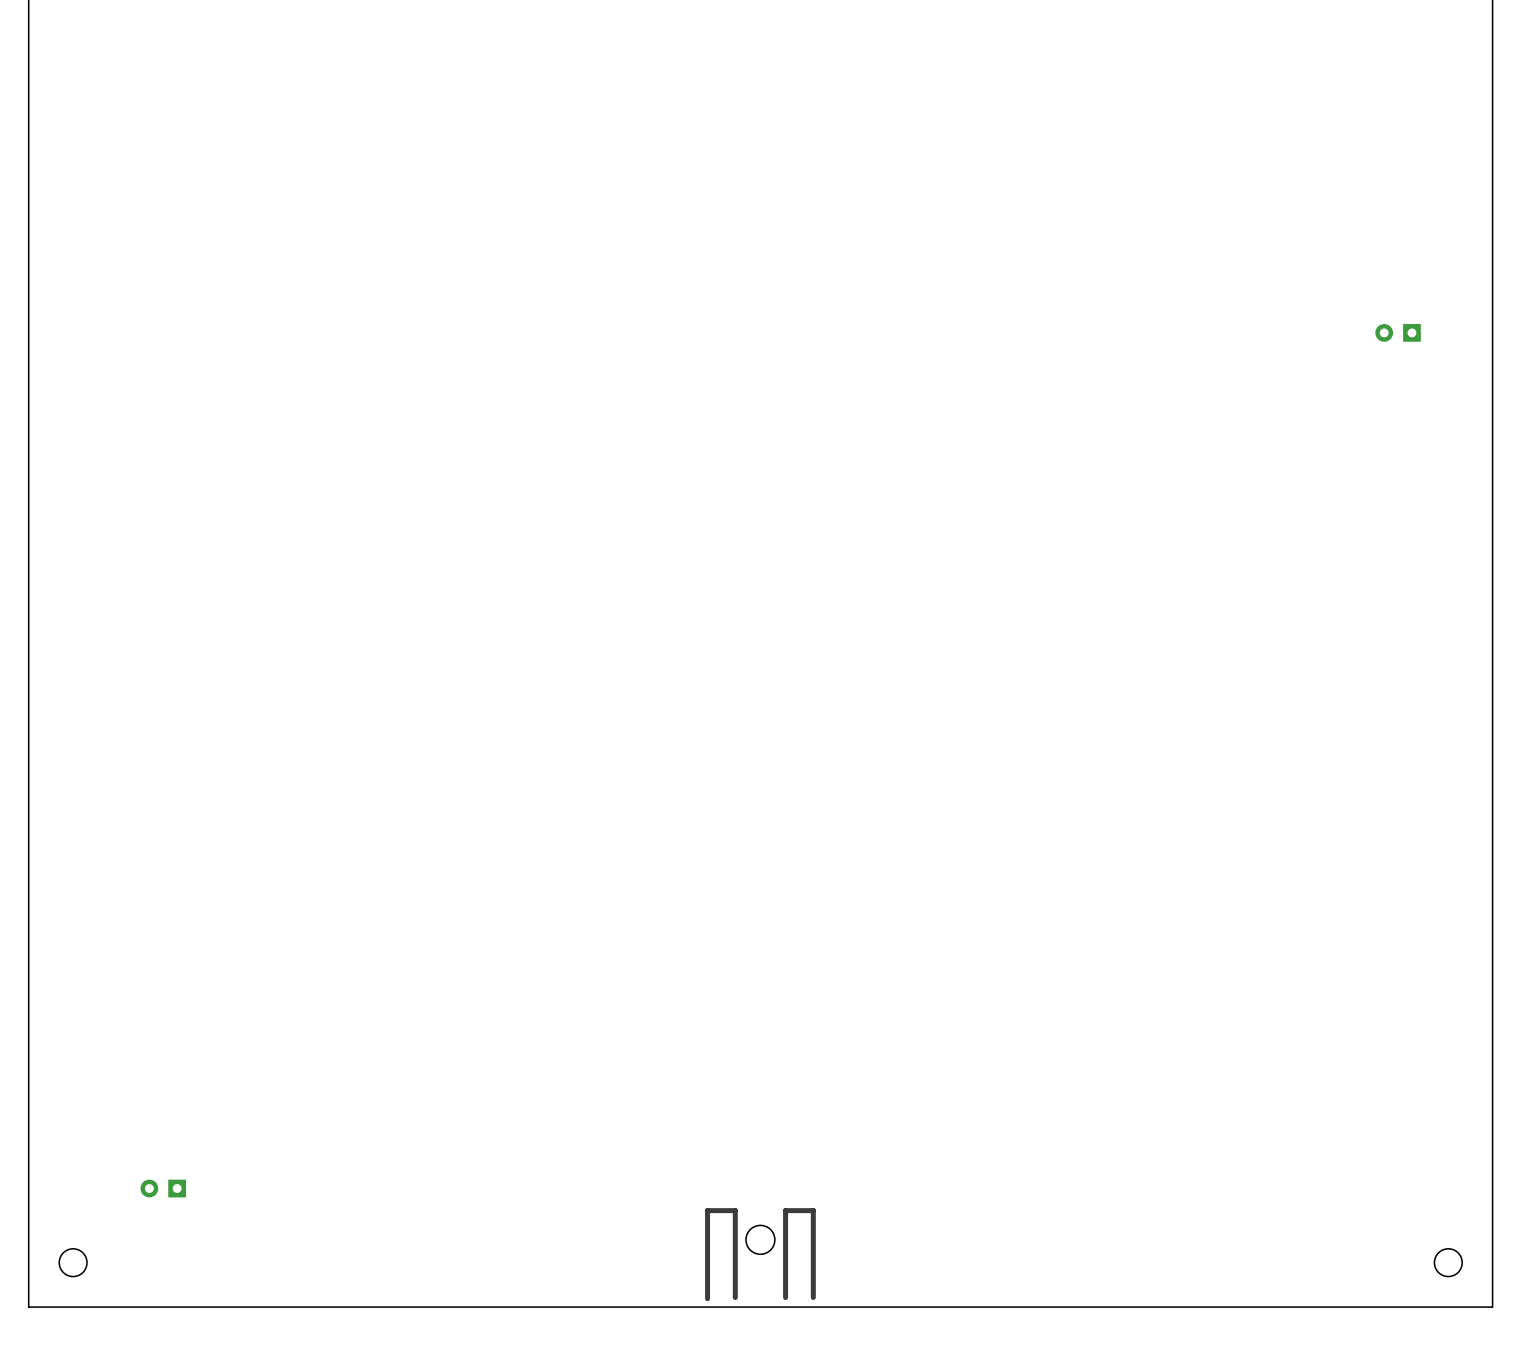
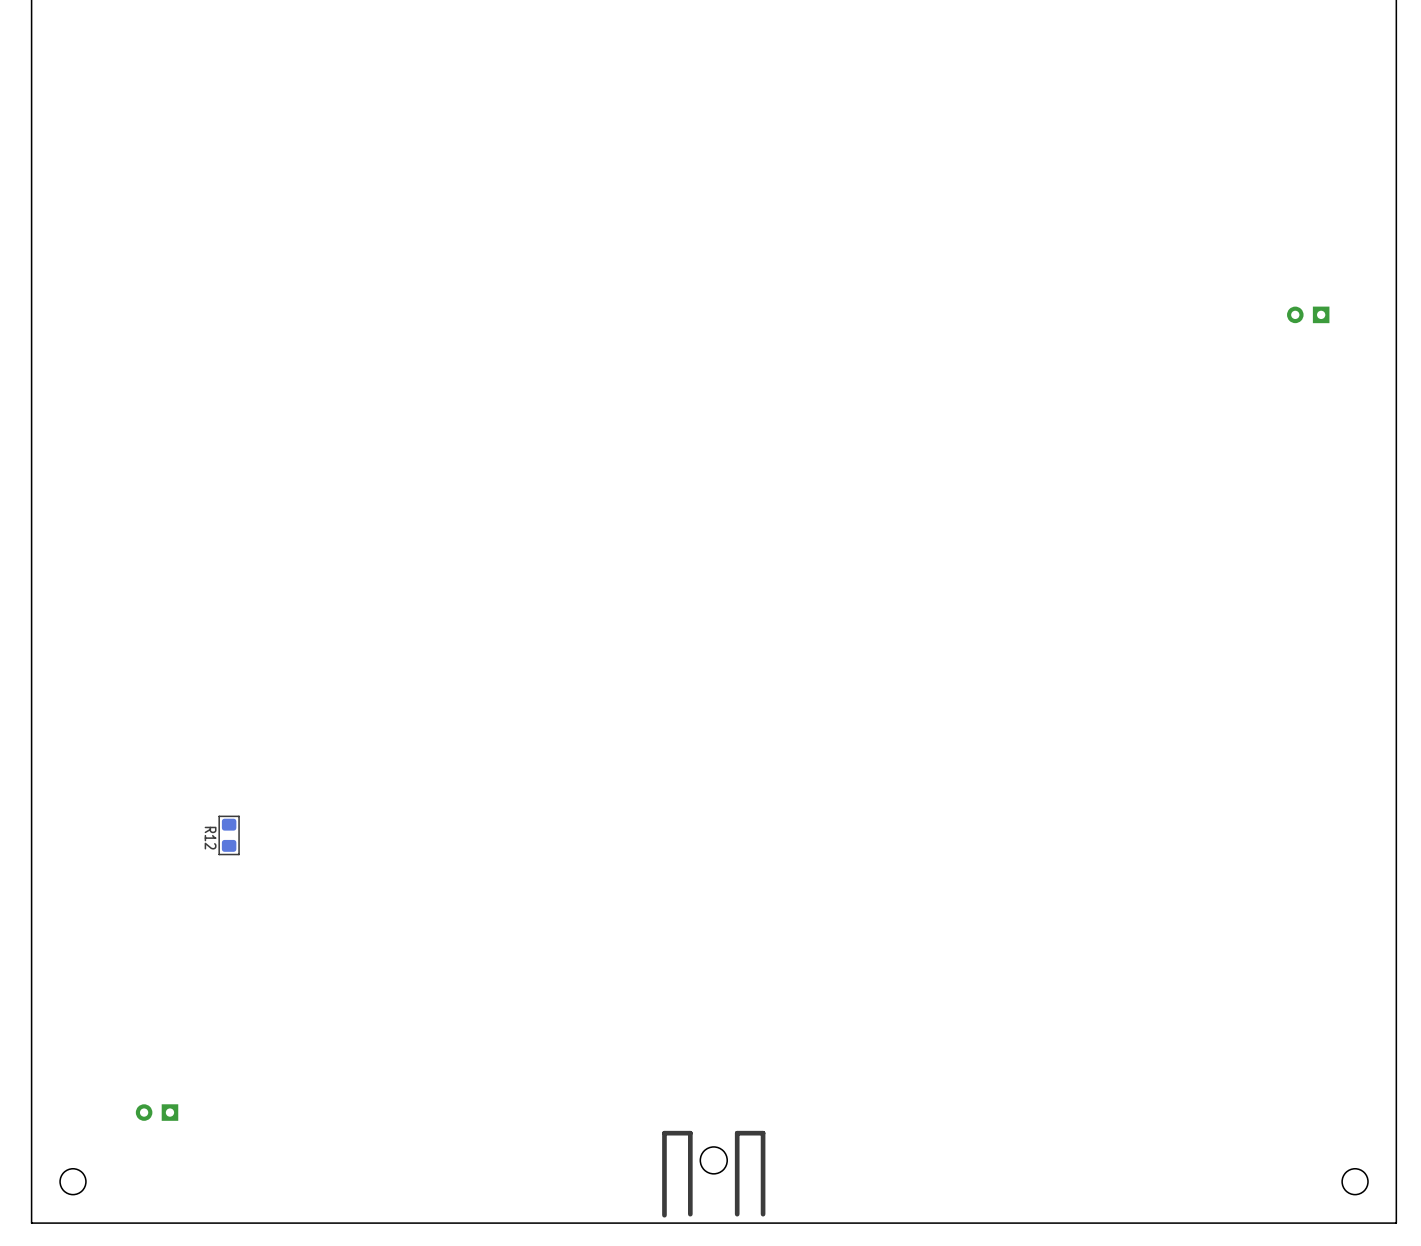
R12: none -> (229, 835)

